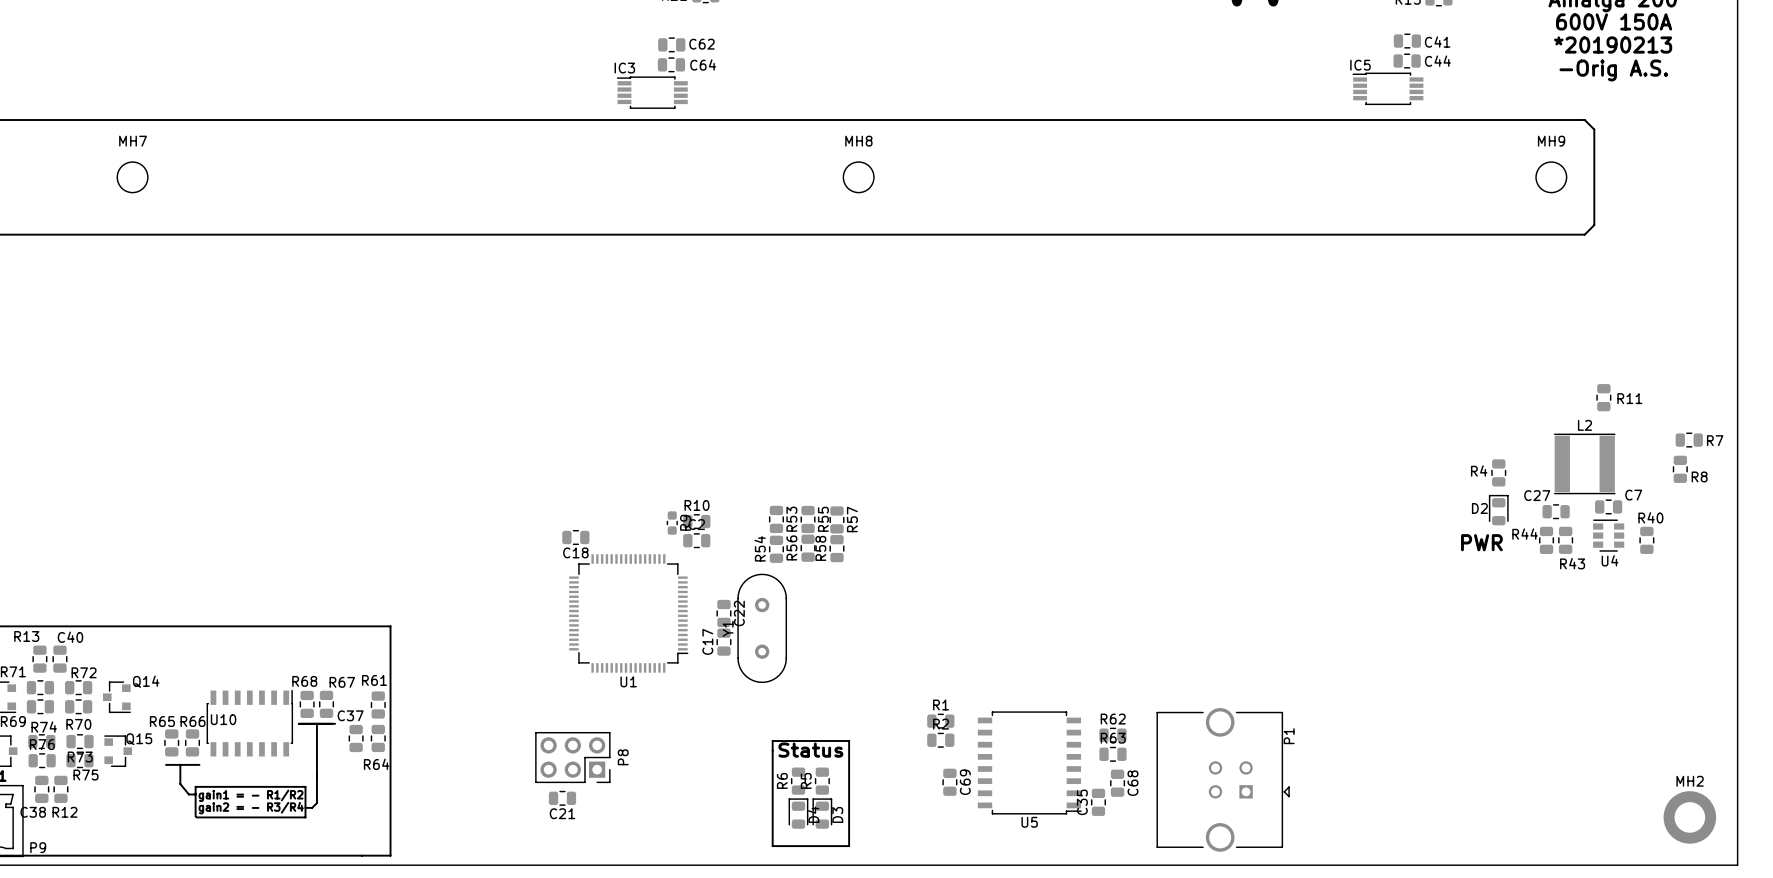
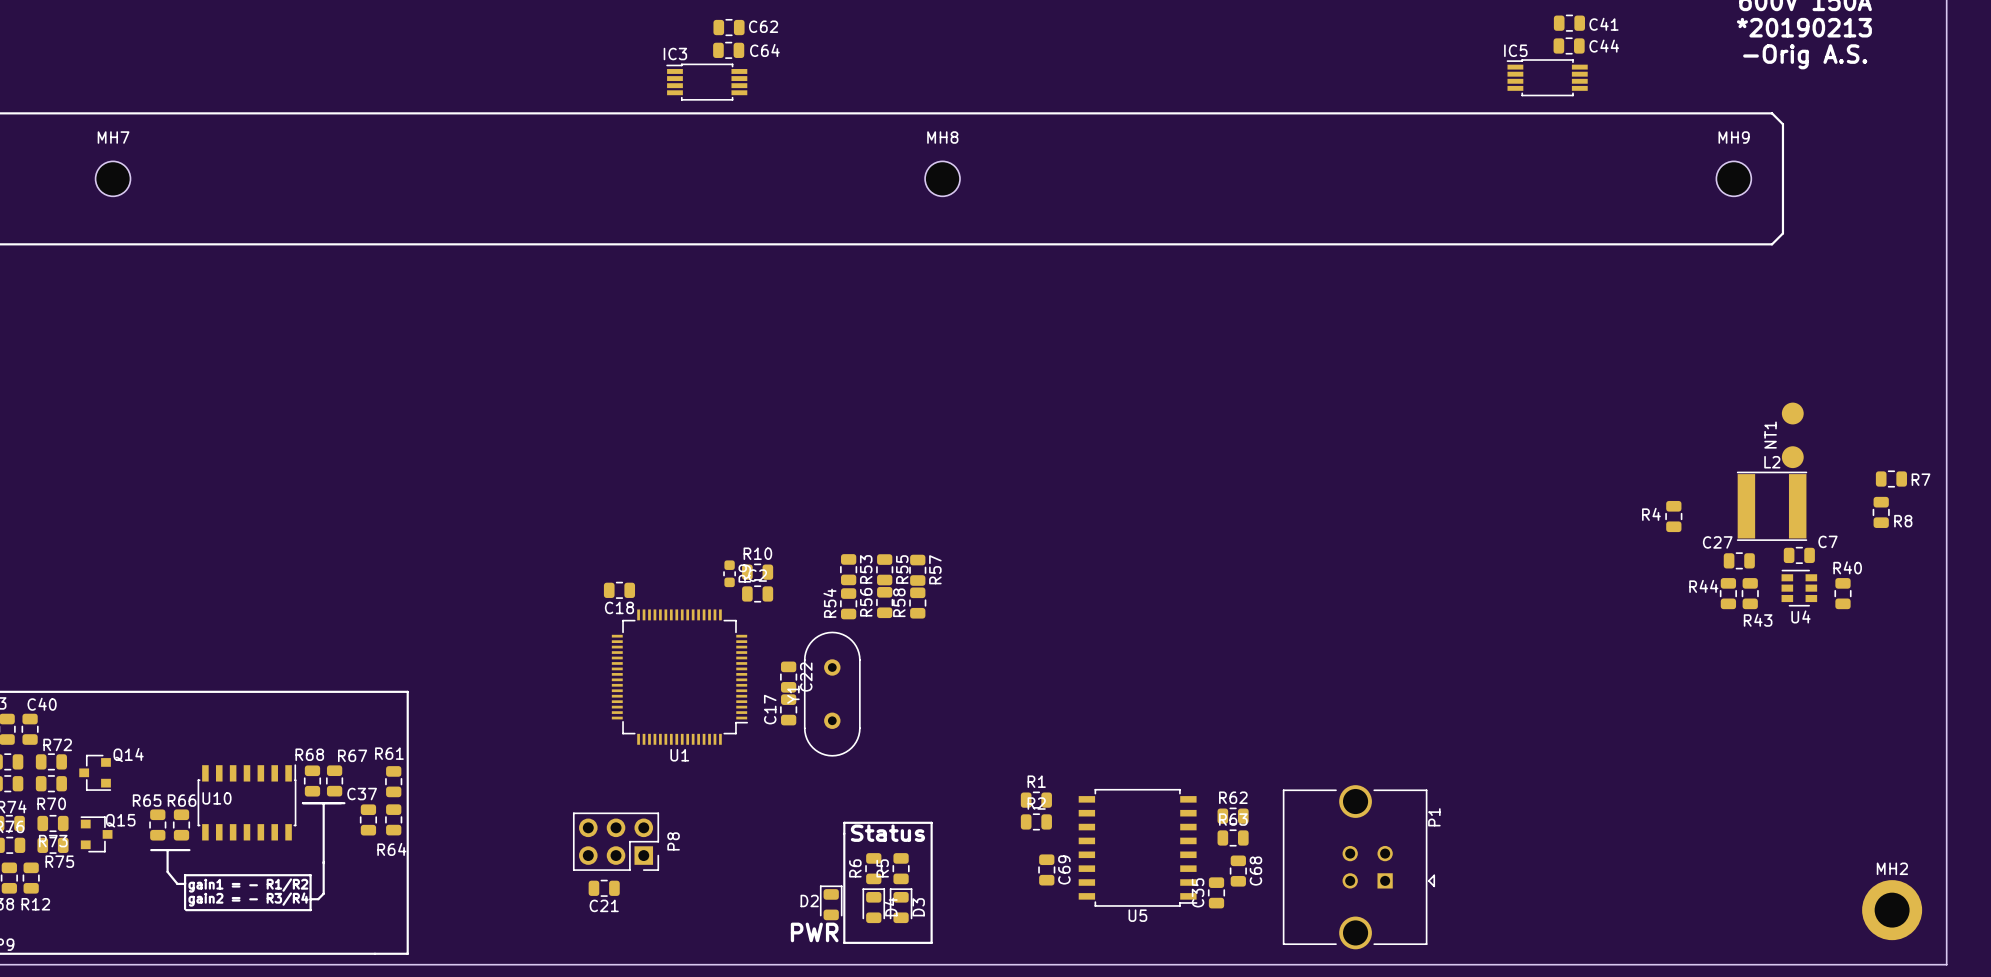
R11: (1603, 397) -> none
NT1: none -> (1792, 435)
D2 position: (1498, 510) -> (831, 902)
text: PWR (1481, 542) -> none
text: none -> PWR (814, 932)

